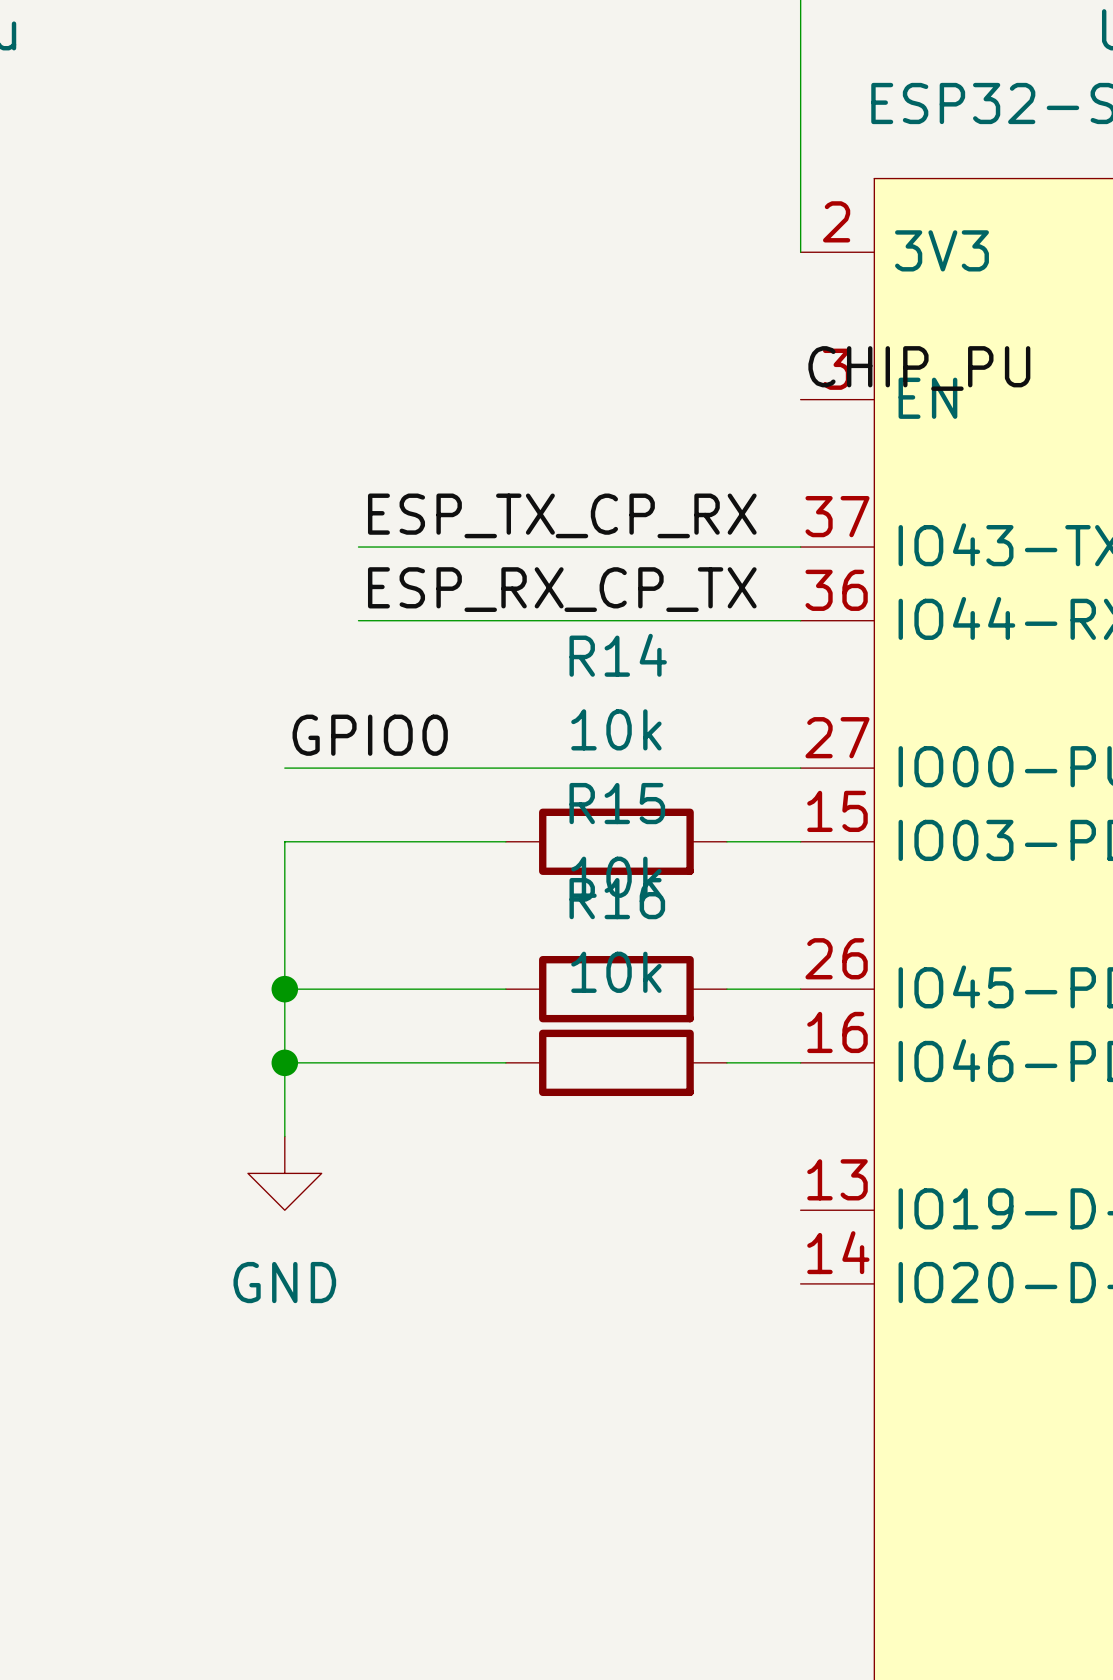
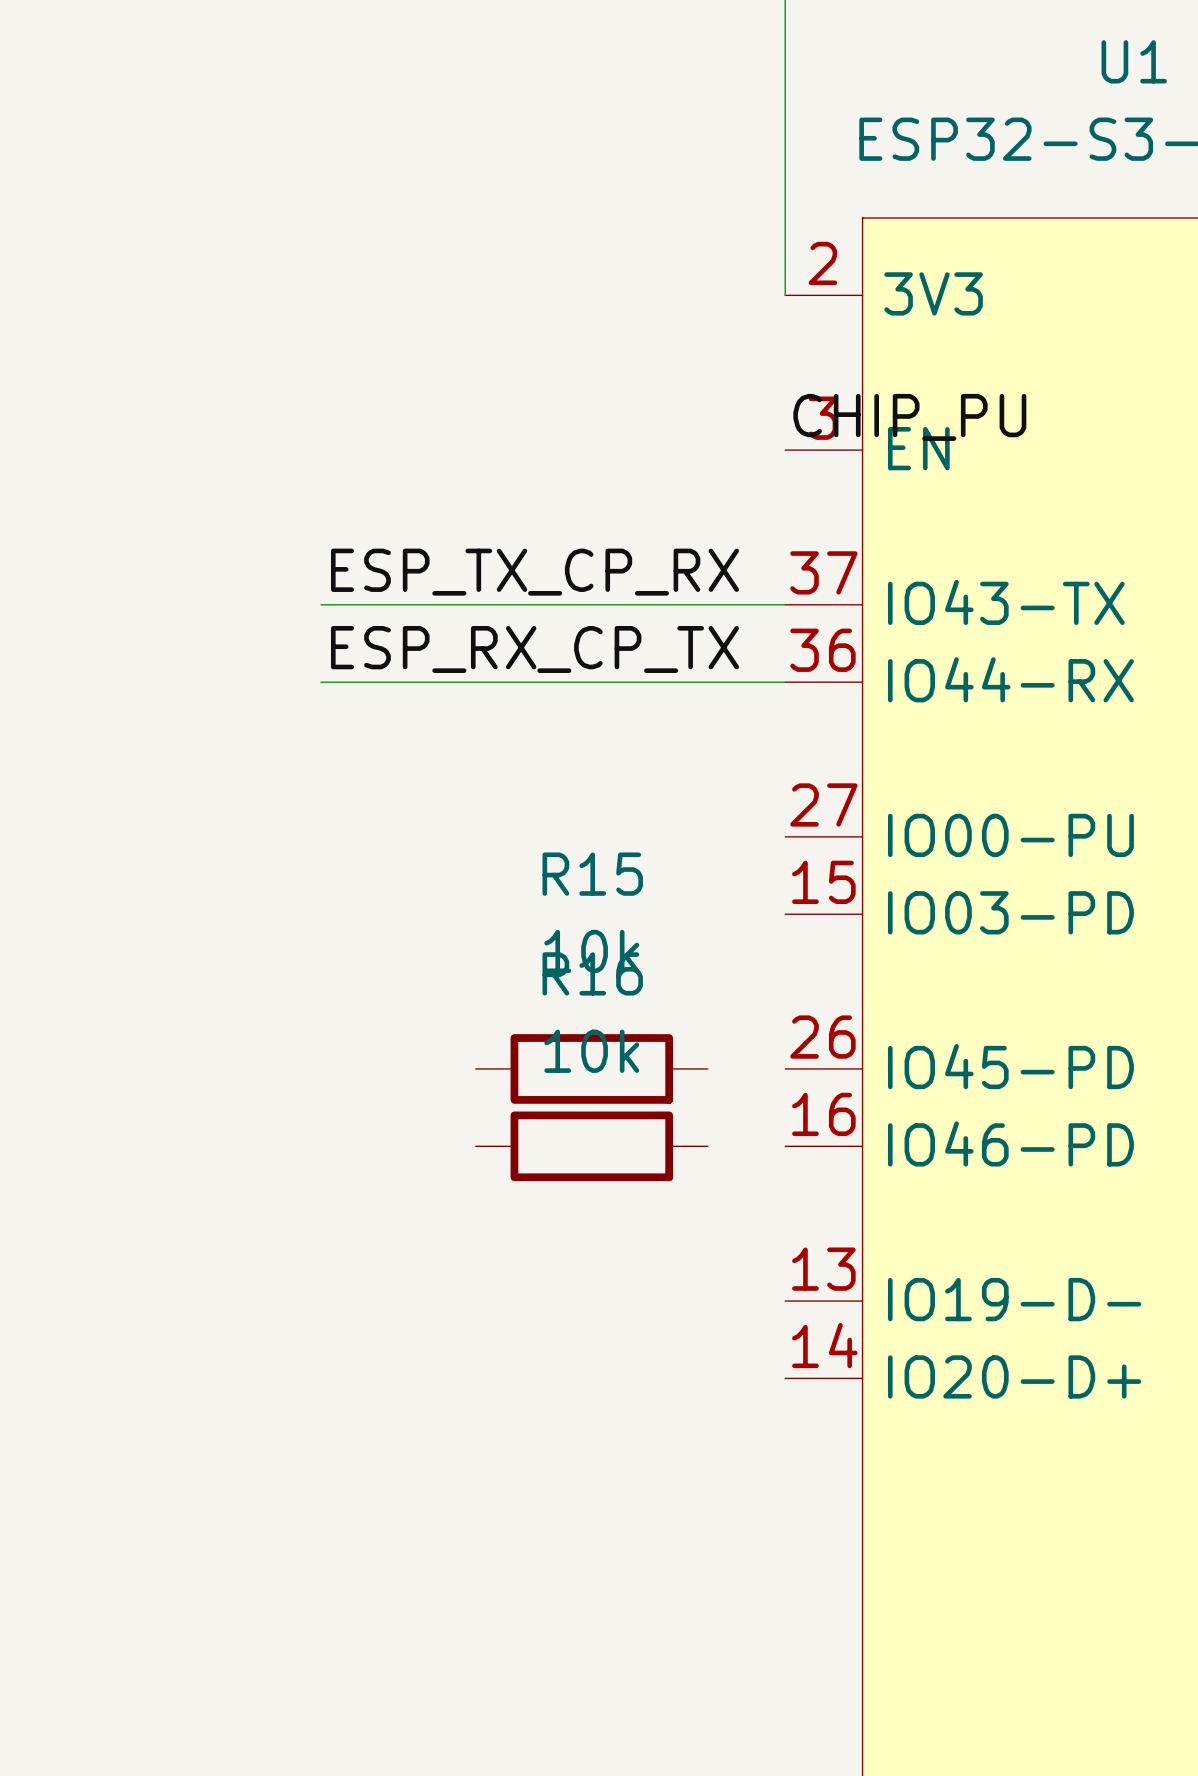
label: GPIO0 (370, 735) -> none
wire: (284, 768) (800, 768) -> none
wire: (505, 841) (284, 841) (284, 1136) -> none
R14: 10k (616, 841) -> none
wire: (726, 841) (800, 841) -> none
wire: (284, 989) (505, 989) -> none
junction: (284, 989) -> none
wire: (726, 989) (800, 989) -> none
wire: (284, 1062) (505, 1062) -> none
junction: (284, 1062) -> none
wire: (726, 1062) (800, 1062) -> none
power symbol: GND (284, 1173) -> none

